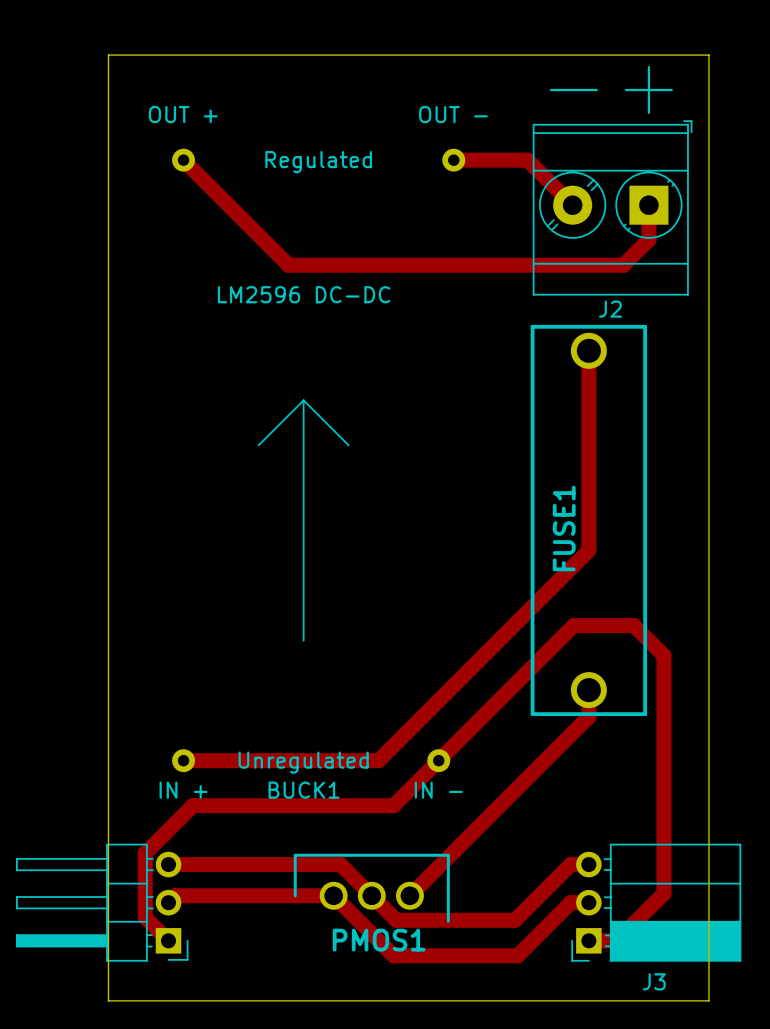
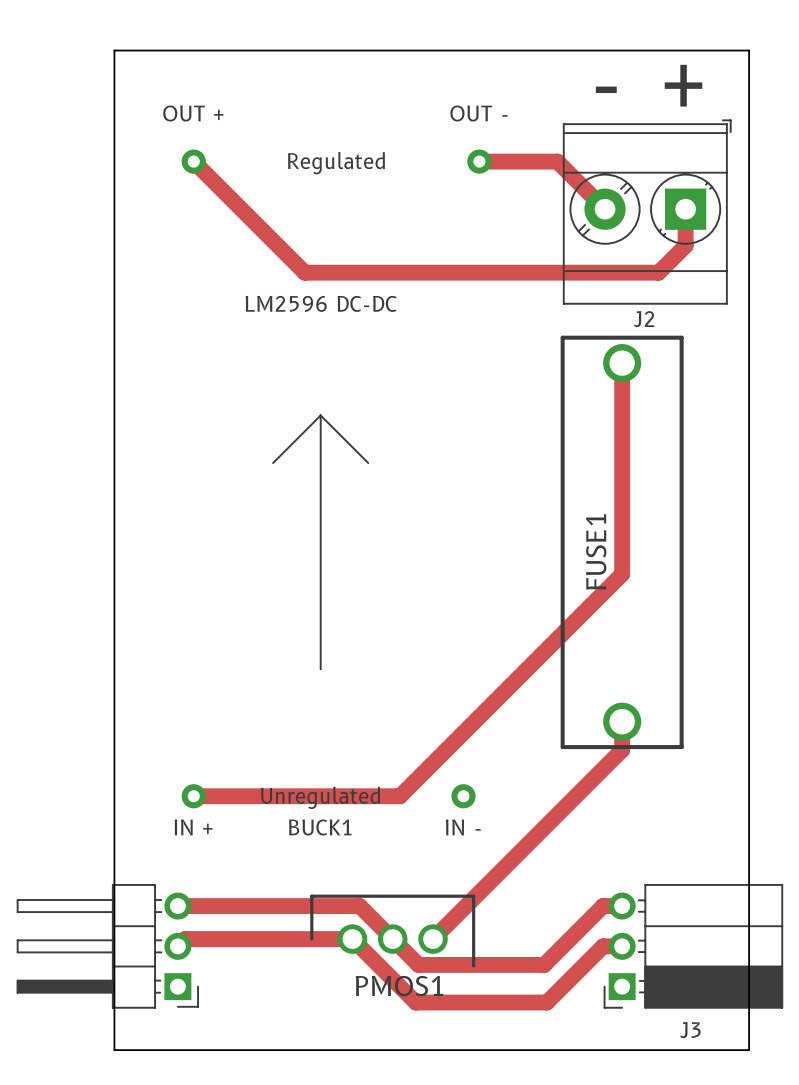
track: (168, 940) (145, 917) (145, 853) (192, 805) (393, 805) (573, 625) (633, 625) (663, 655) (663, 893) (616, 940) (588, 940) -> none

